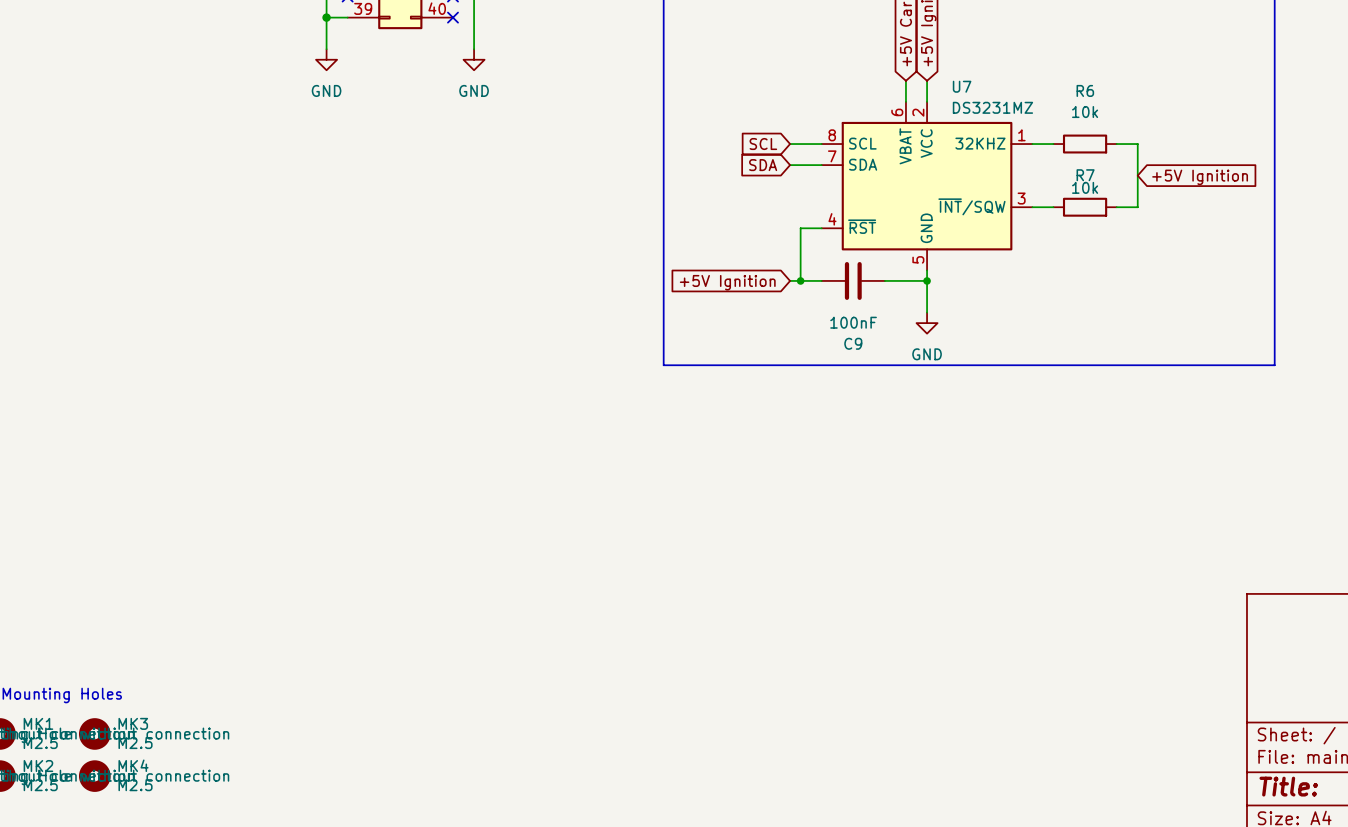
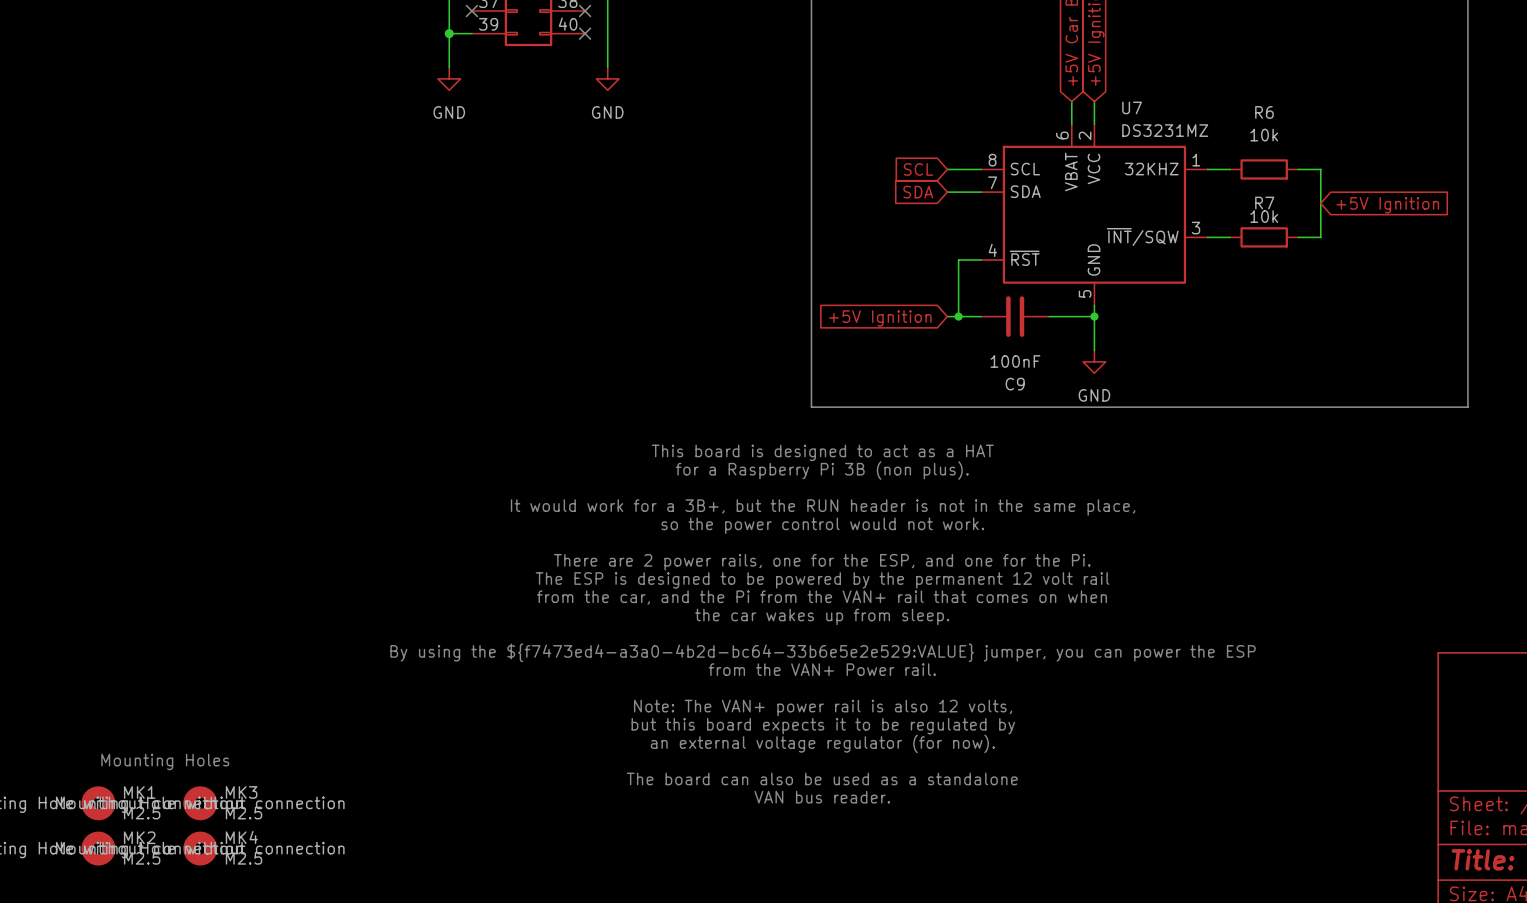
text: none -> This board is designed to act as a HAT (822, 452)
text: none -> for a Raspberry Pi 3B (non plus). (822, 470)
text: none -> It would work for a 3B+, but the RUN header is not in the same place, (823, 507)
text: none -> so the power control would not work. (822, 525)
text: none -> There are 2 power rails, one for the ESP, and one for the Pi. (822, 562)
text: none -> The ESP is designed to be powered by the permanent 12 volt rail (822, 580)
text: none -> from the car, and the Pi from the VAN+ rail that comes on when (821, 597)
text: none -> the car wakes up from sleep. (822, 616)
text: none -> By using the ${f7473ed4-a3a0-4b2d-bc64-33b6e5e2e529:VALUE} jumper, you can power the ESP (823, 652)
text: none -> from the VAN+ Power rail. (822, 669)
text: none -> Note: The VAN+ power rail is also 12 volts, (823, 707)
text: none -> but this board expects it to be regulated by (823, 726)
text: none -> an external voltage regulator (for now). (822, 743)
text: none -> The board can also be used as a standalone (822, 778)
text: none -> VAN bus reader. (822, 797)

